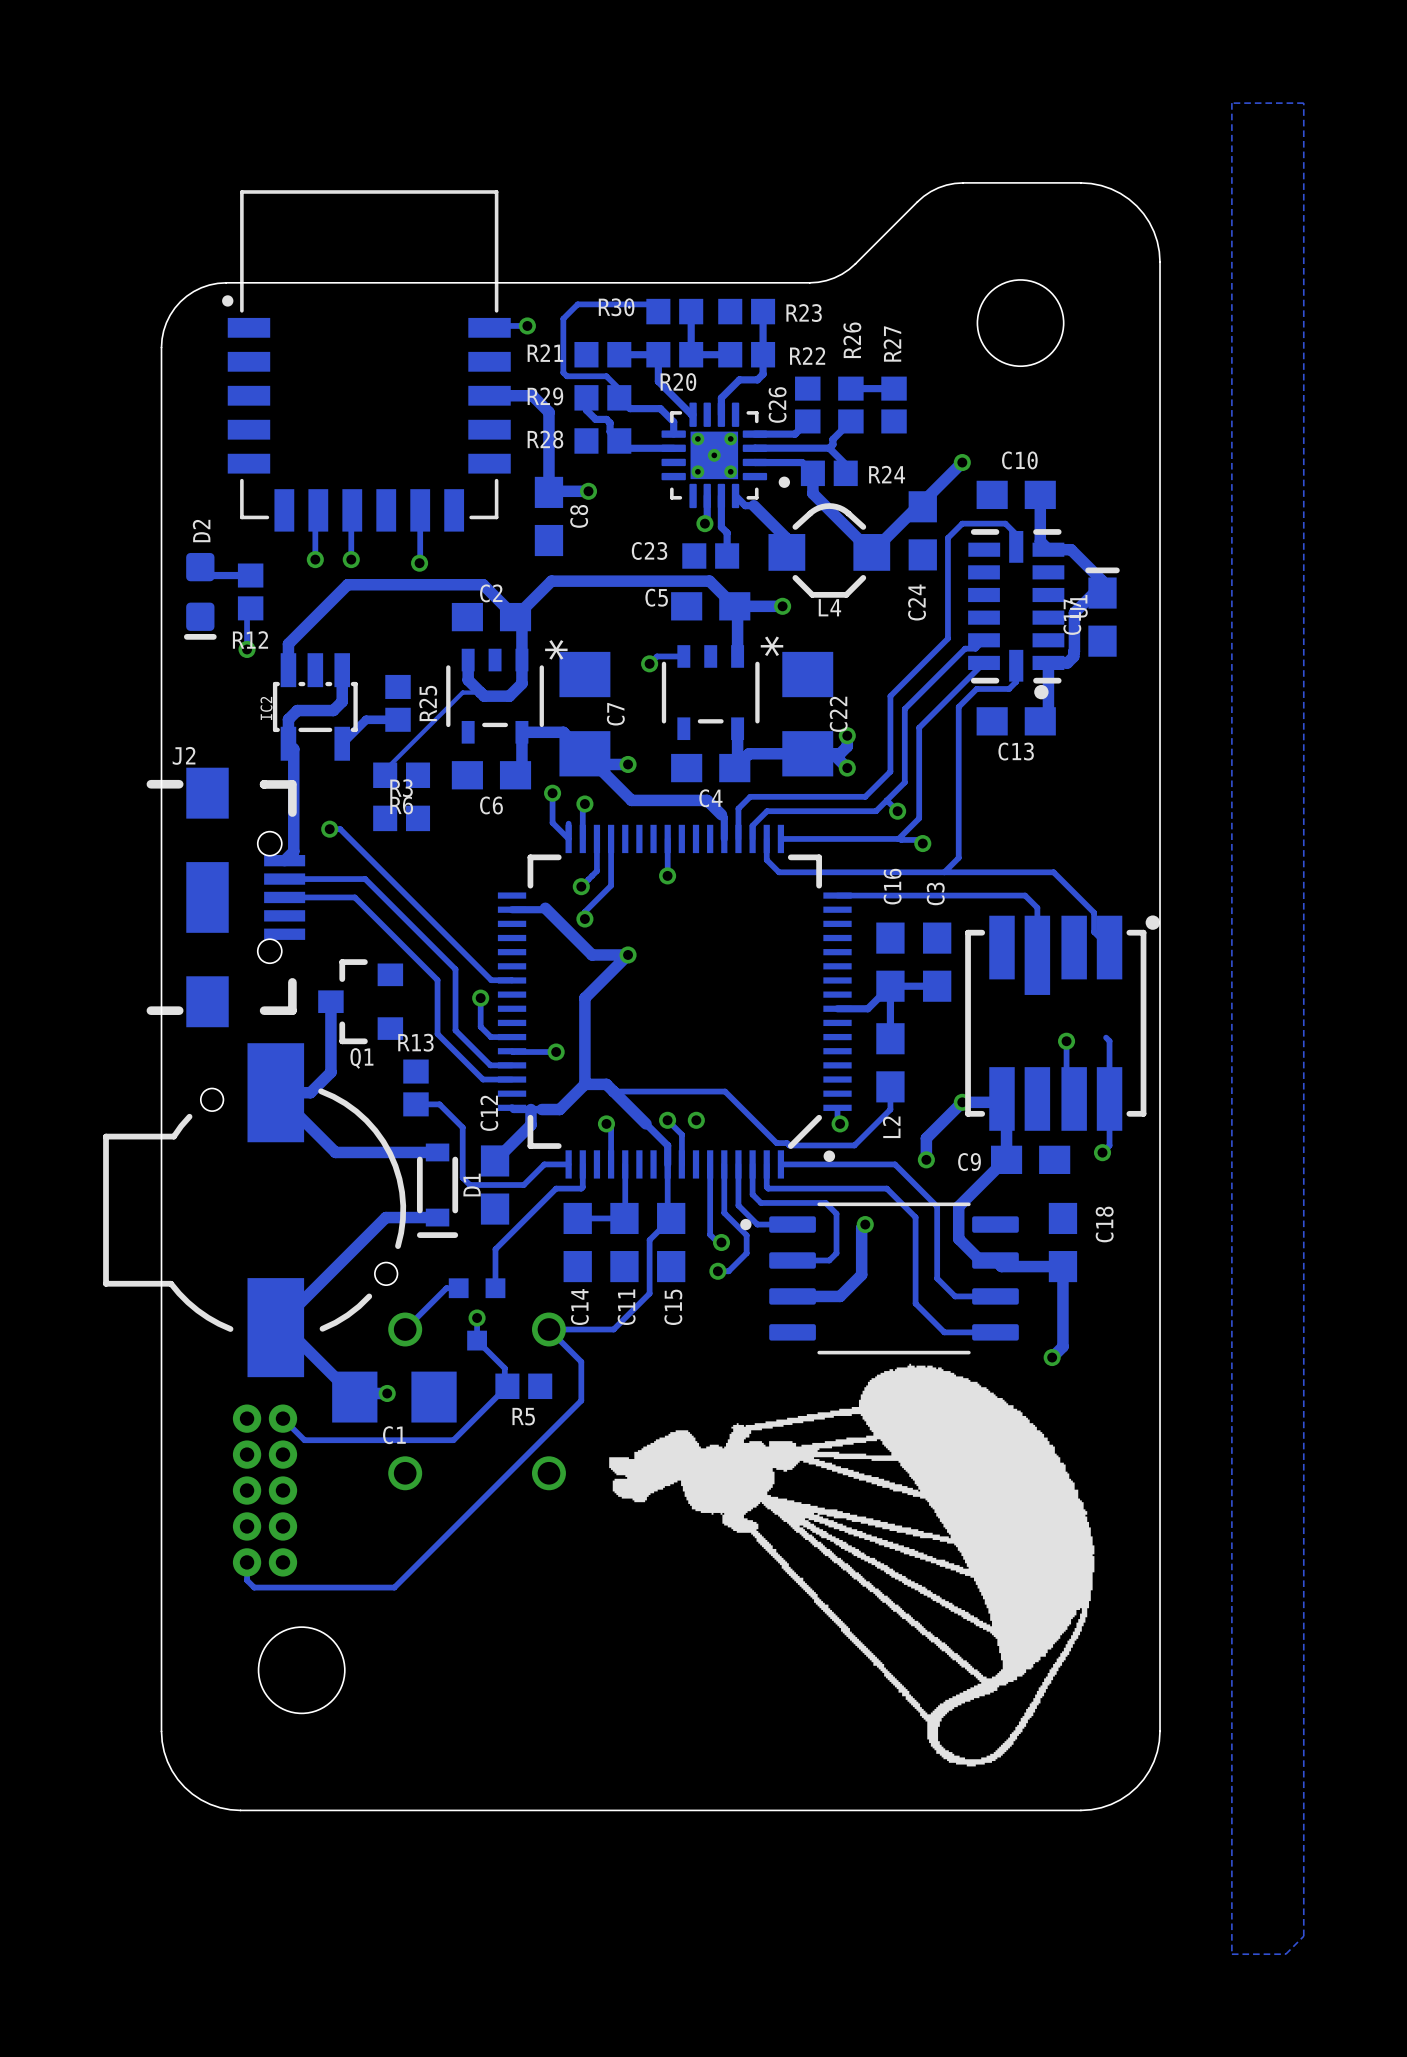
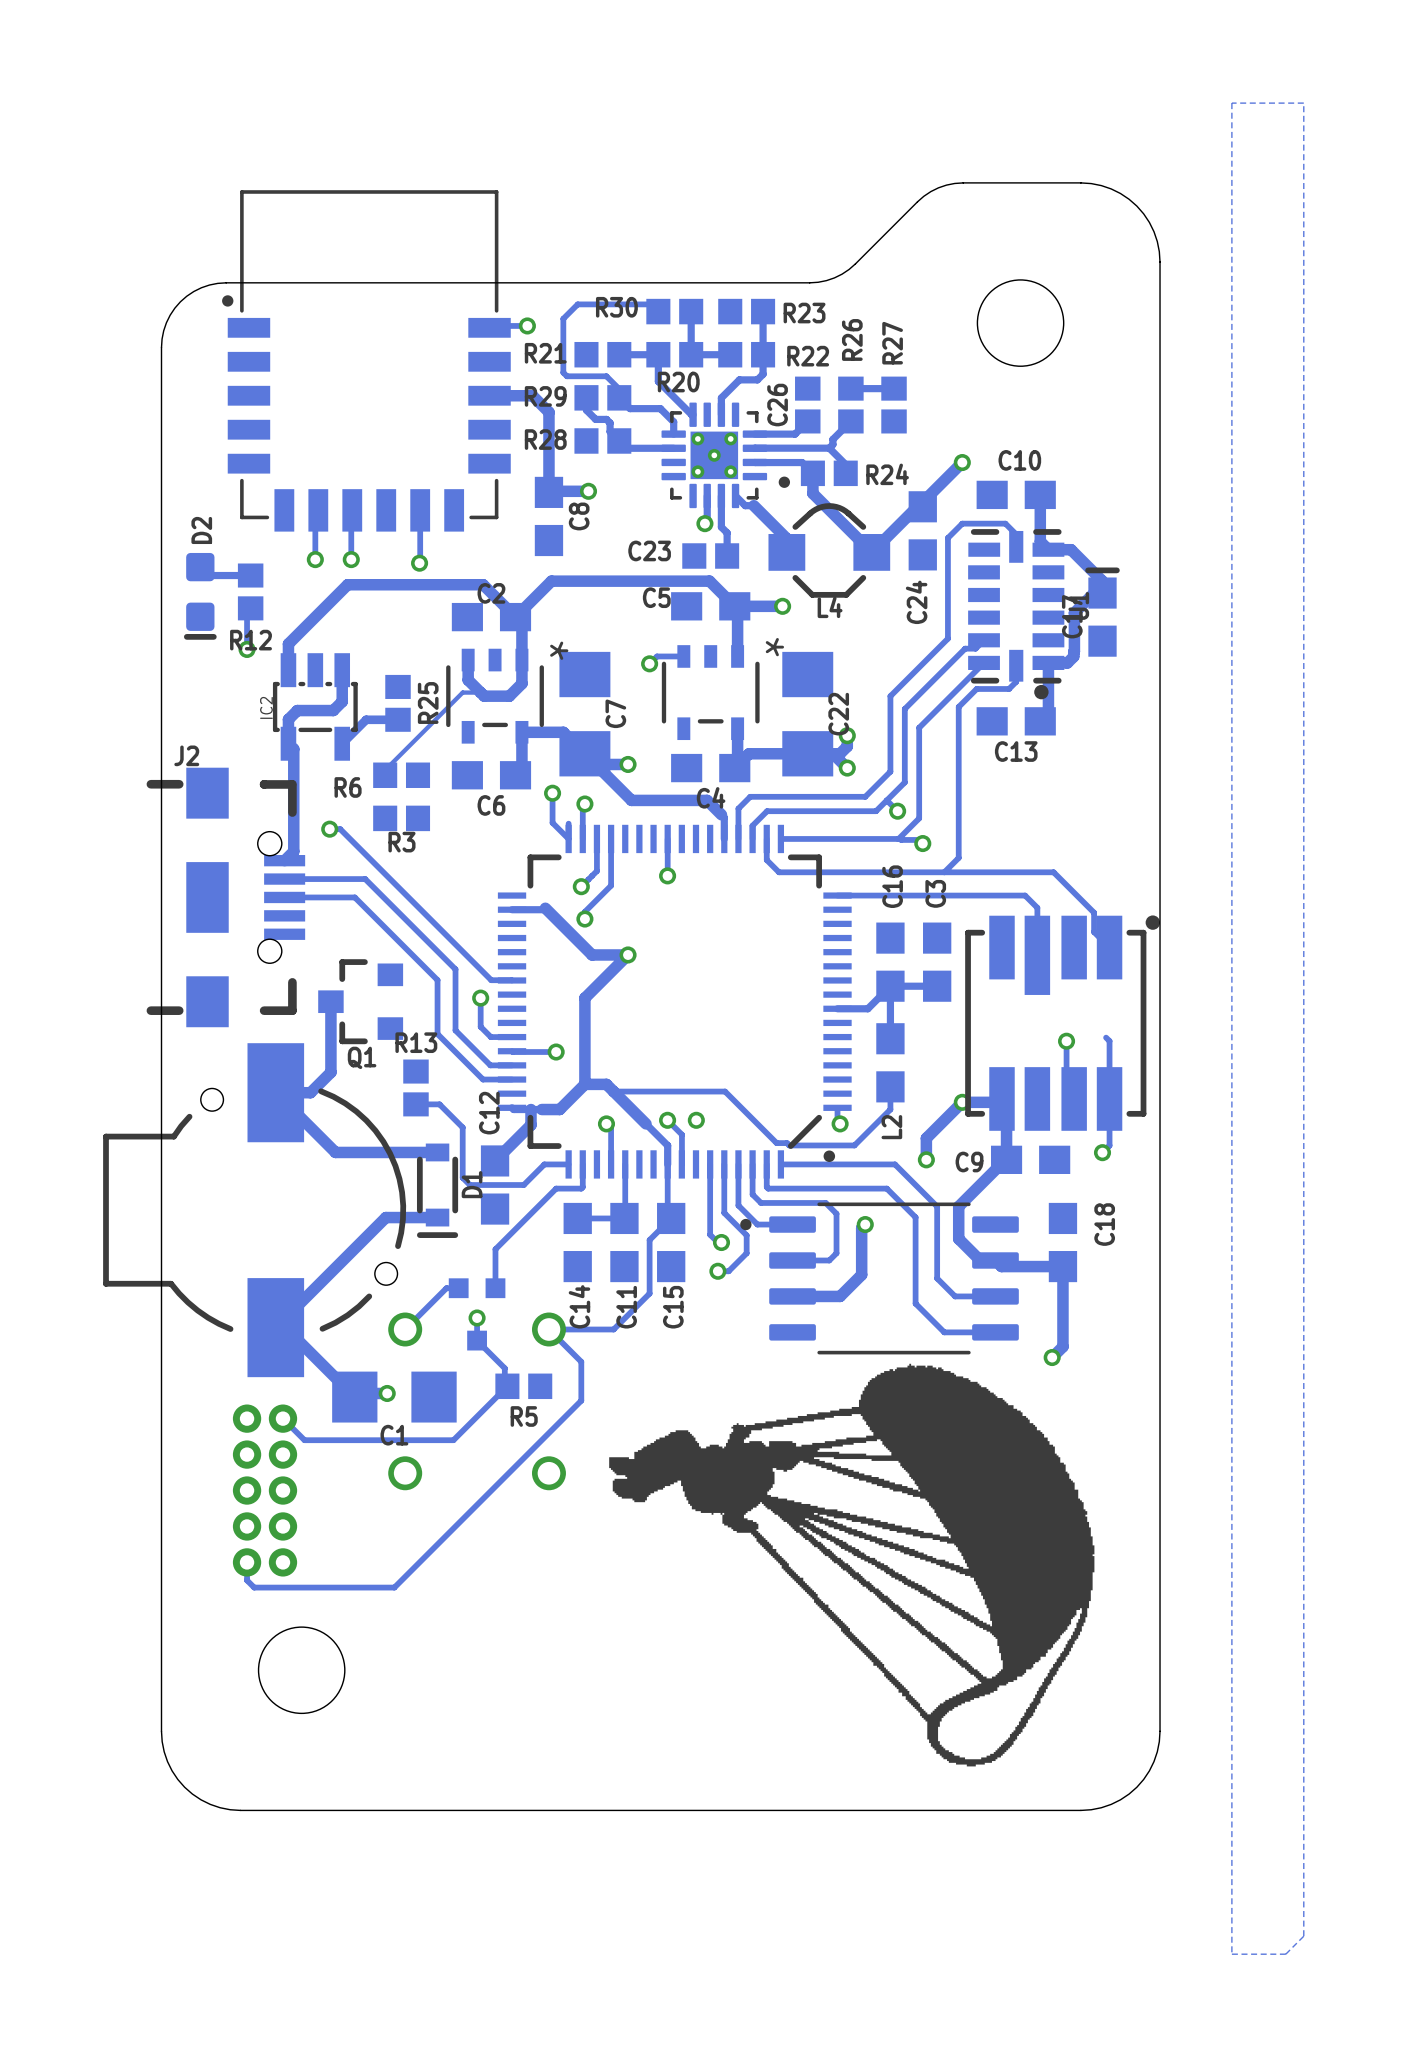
R3 name position: R3 (401, 788) -> R3 (401, 842)
R6 name position: R6 (401, 805) -> R6 (348, 787)

